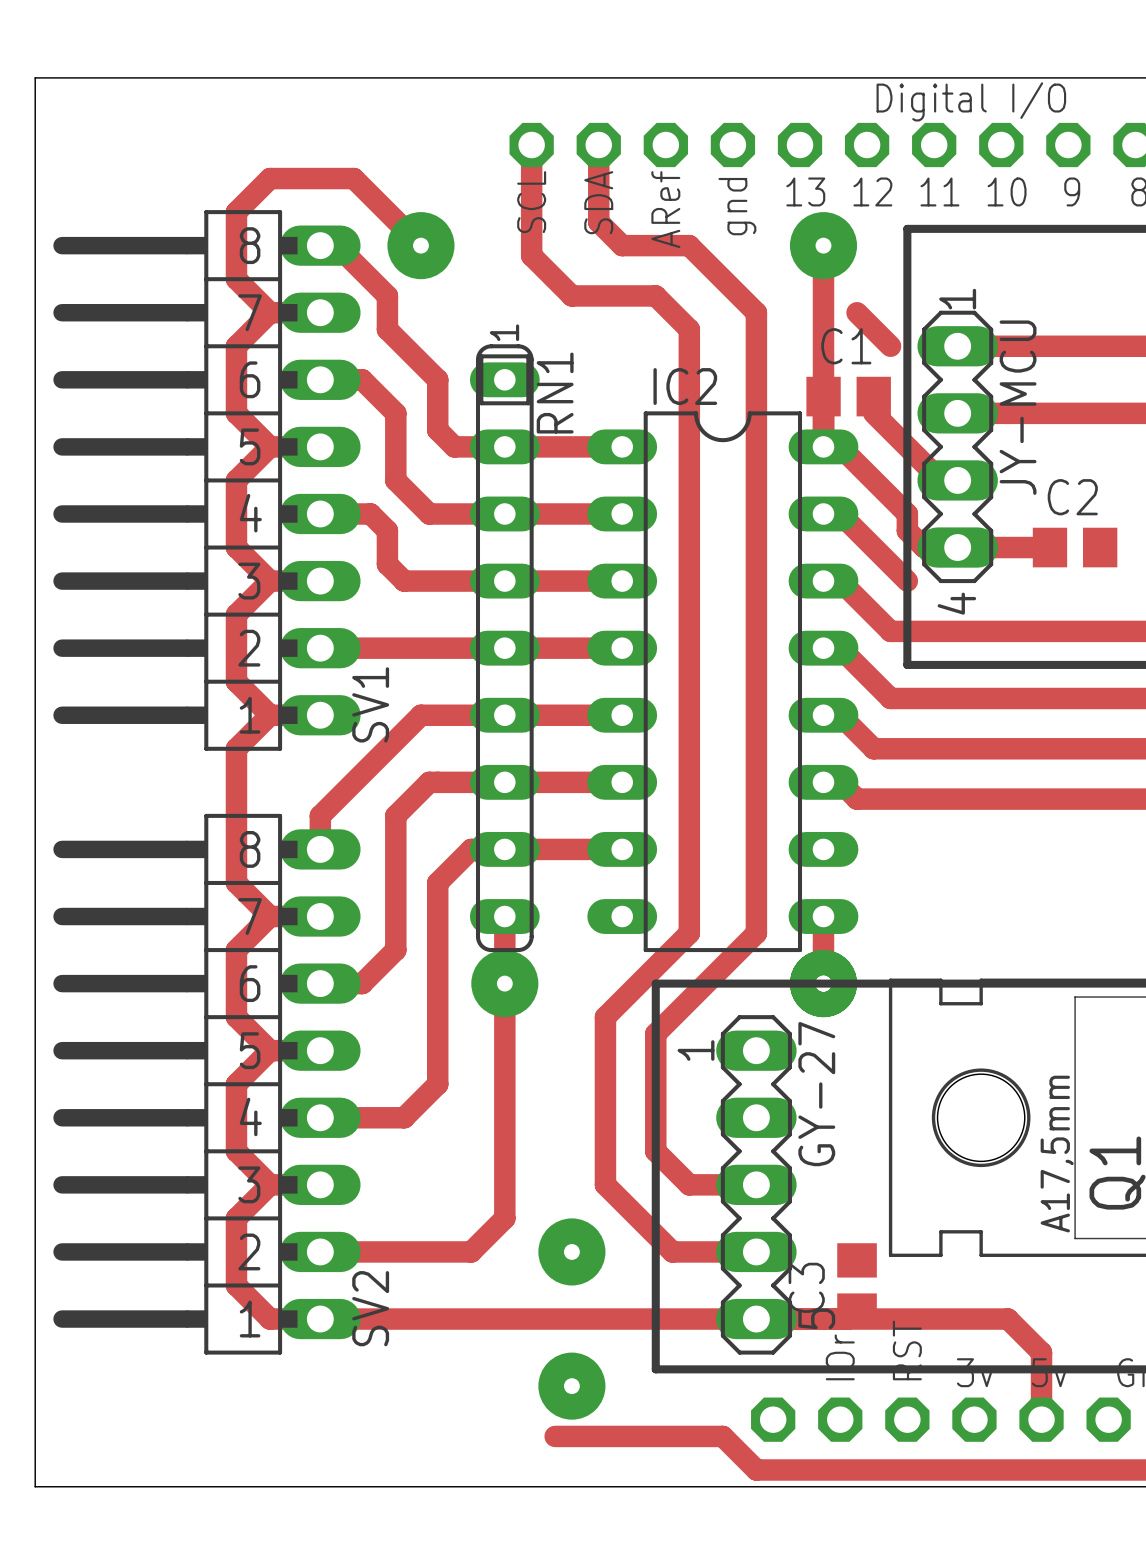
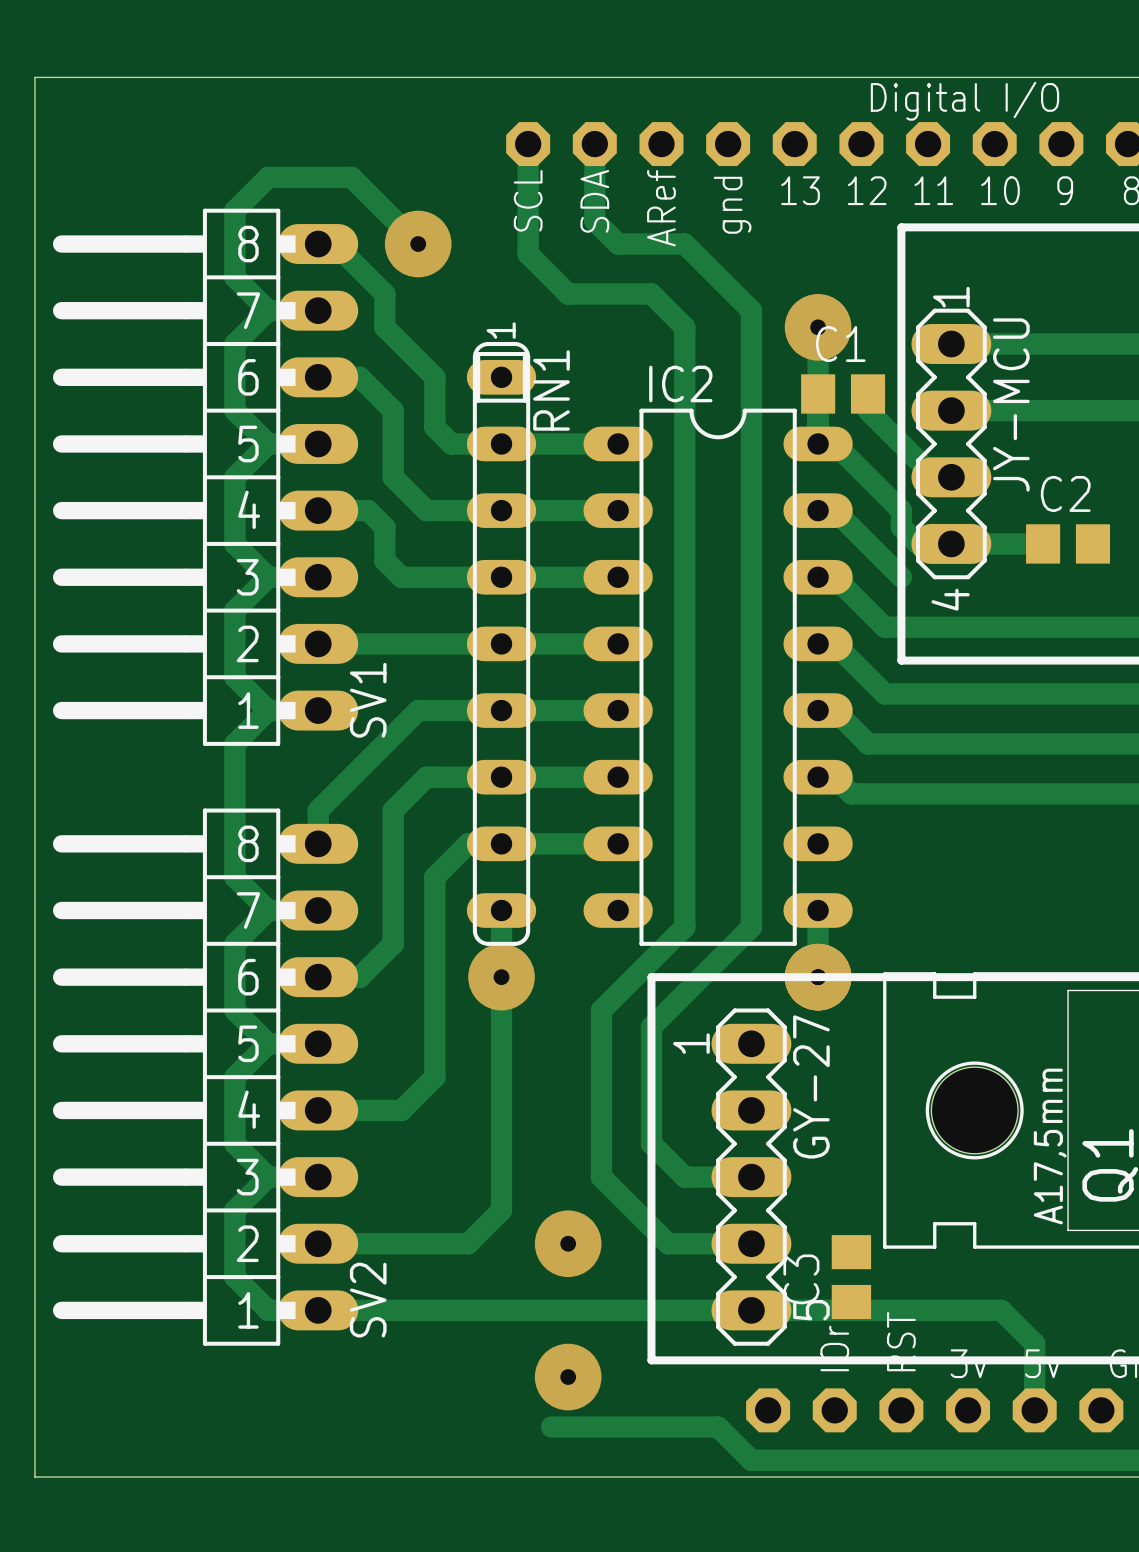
track: (823, 245) (823, 329) -> none
via position: (823, 245) -> (818, 327)
track: (857, 312) (890, 346) -> none

